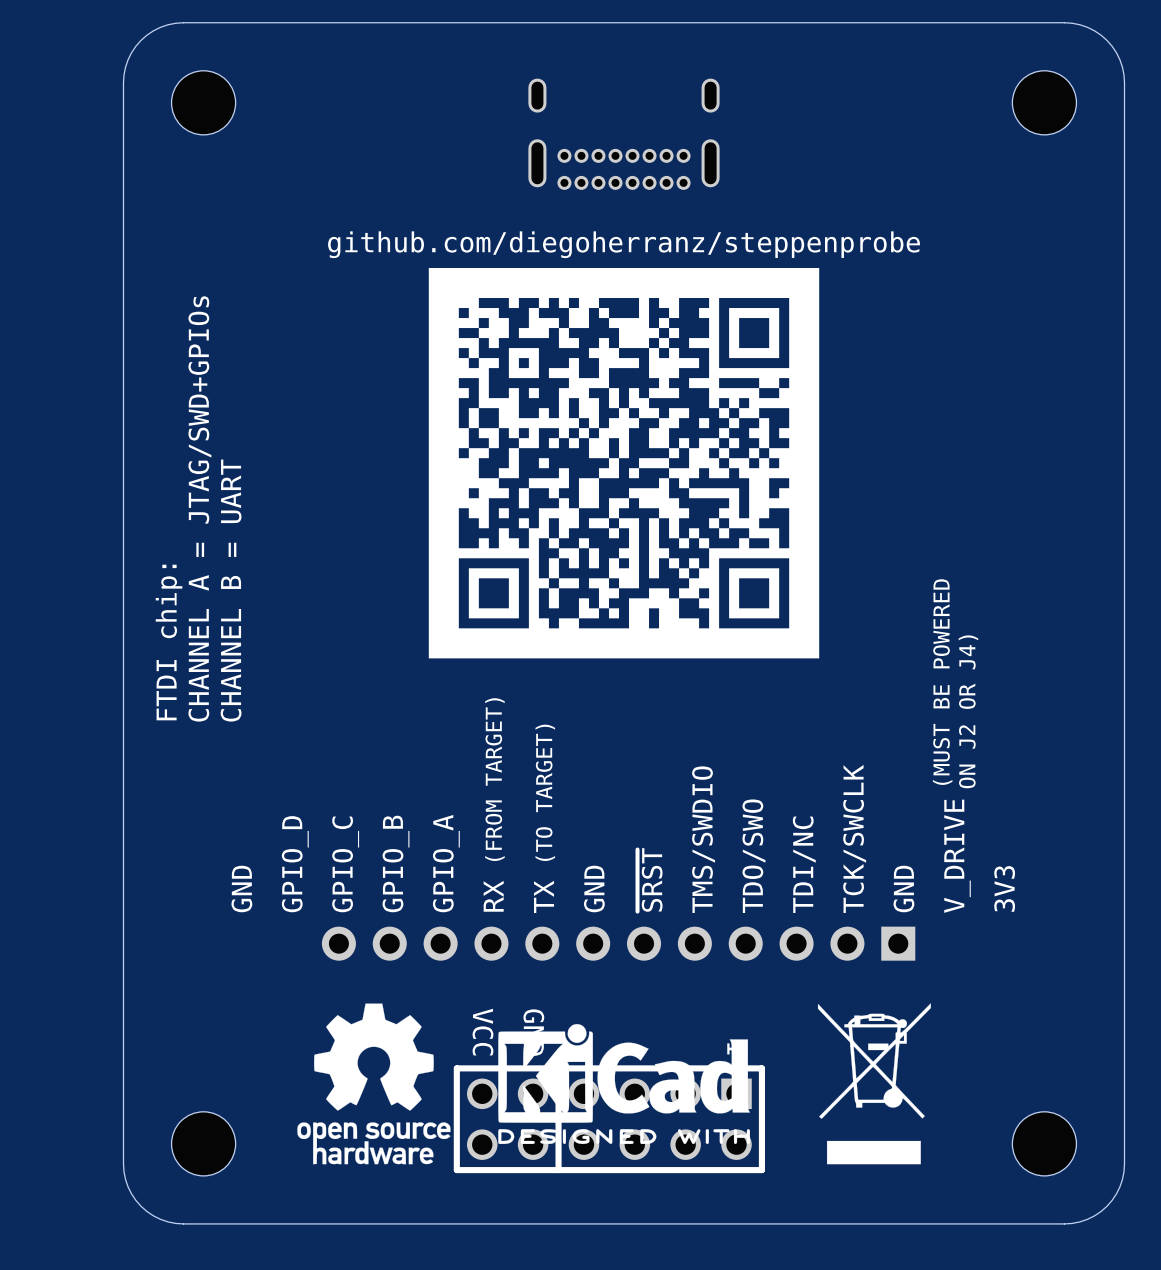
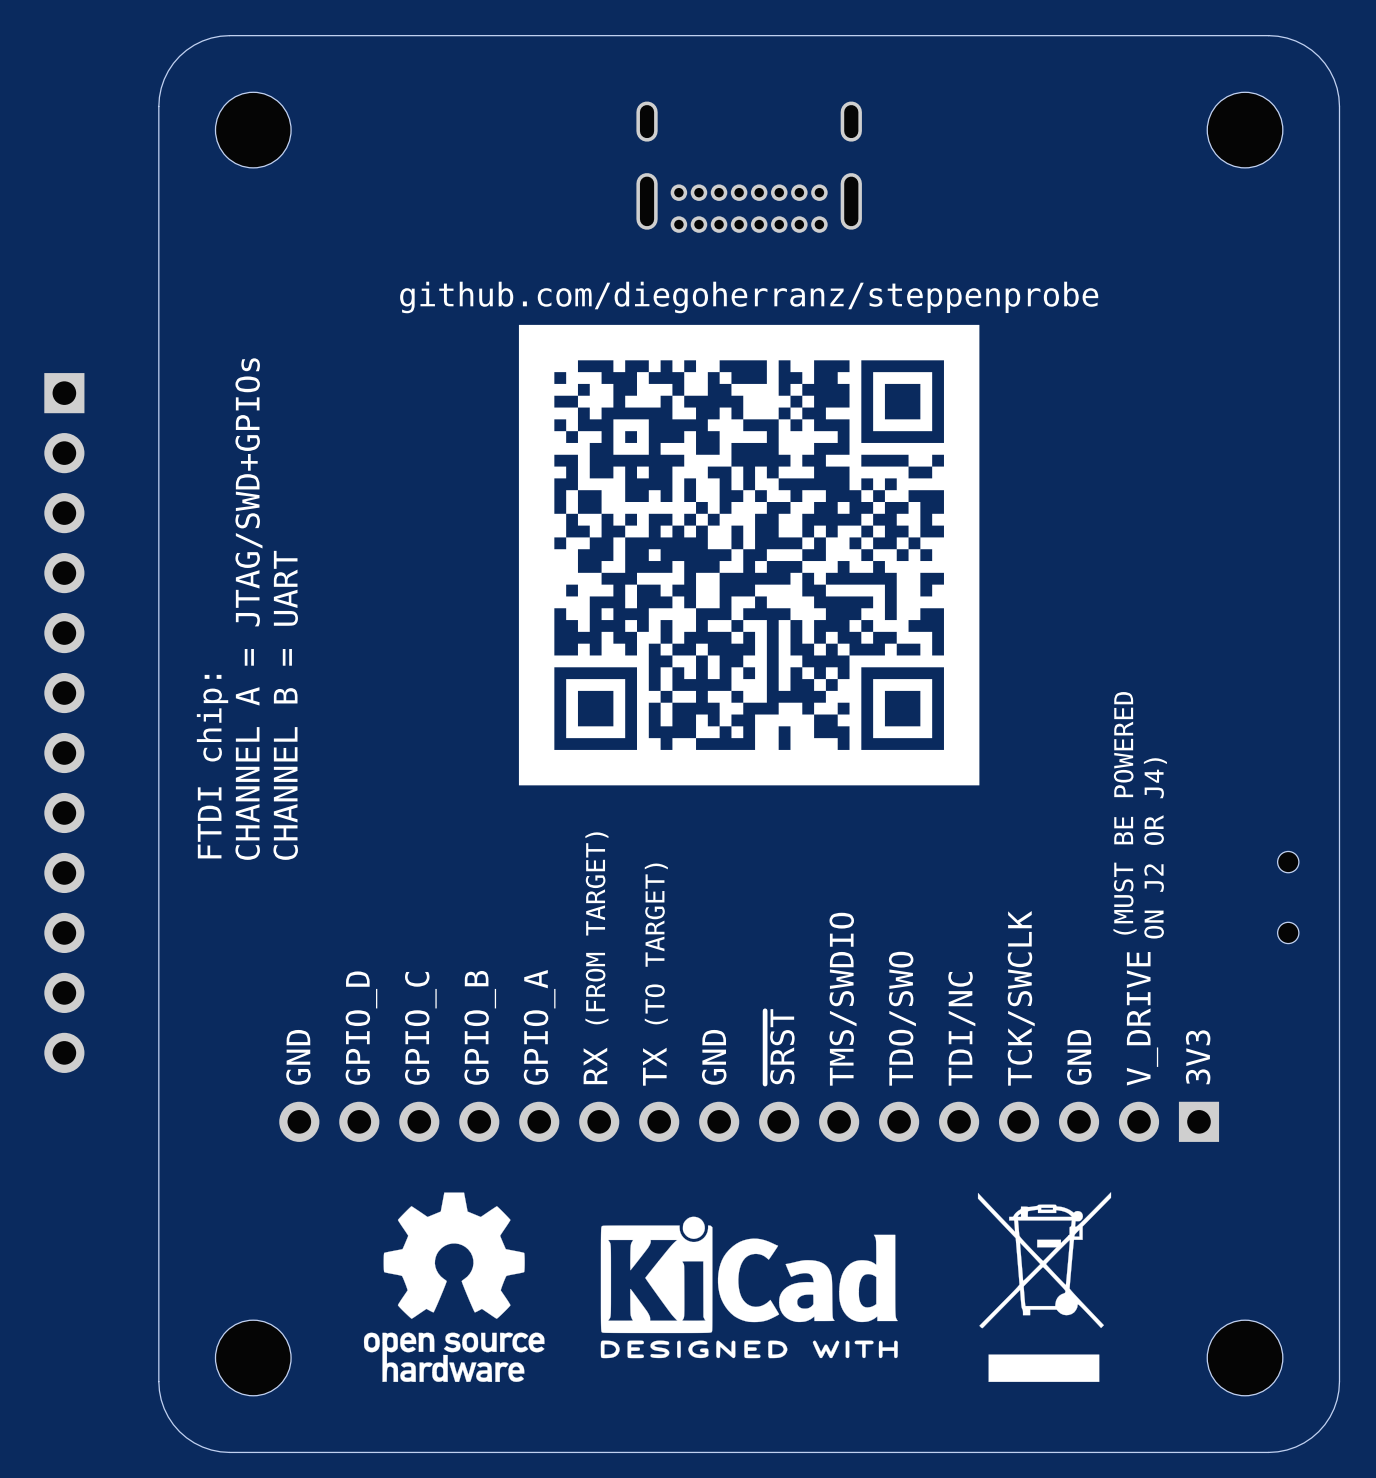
part: none -> (64, 723)
part: none -> (1288, 897)
part footprint: [321, 926, 916, 961] -> [279, 1101, 1220, 1142]
part: (609, 1119) -> none

